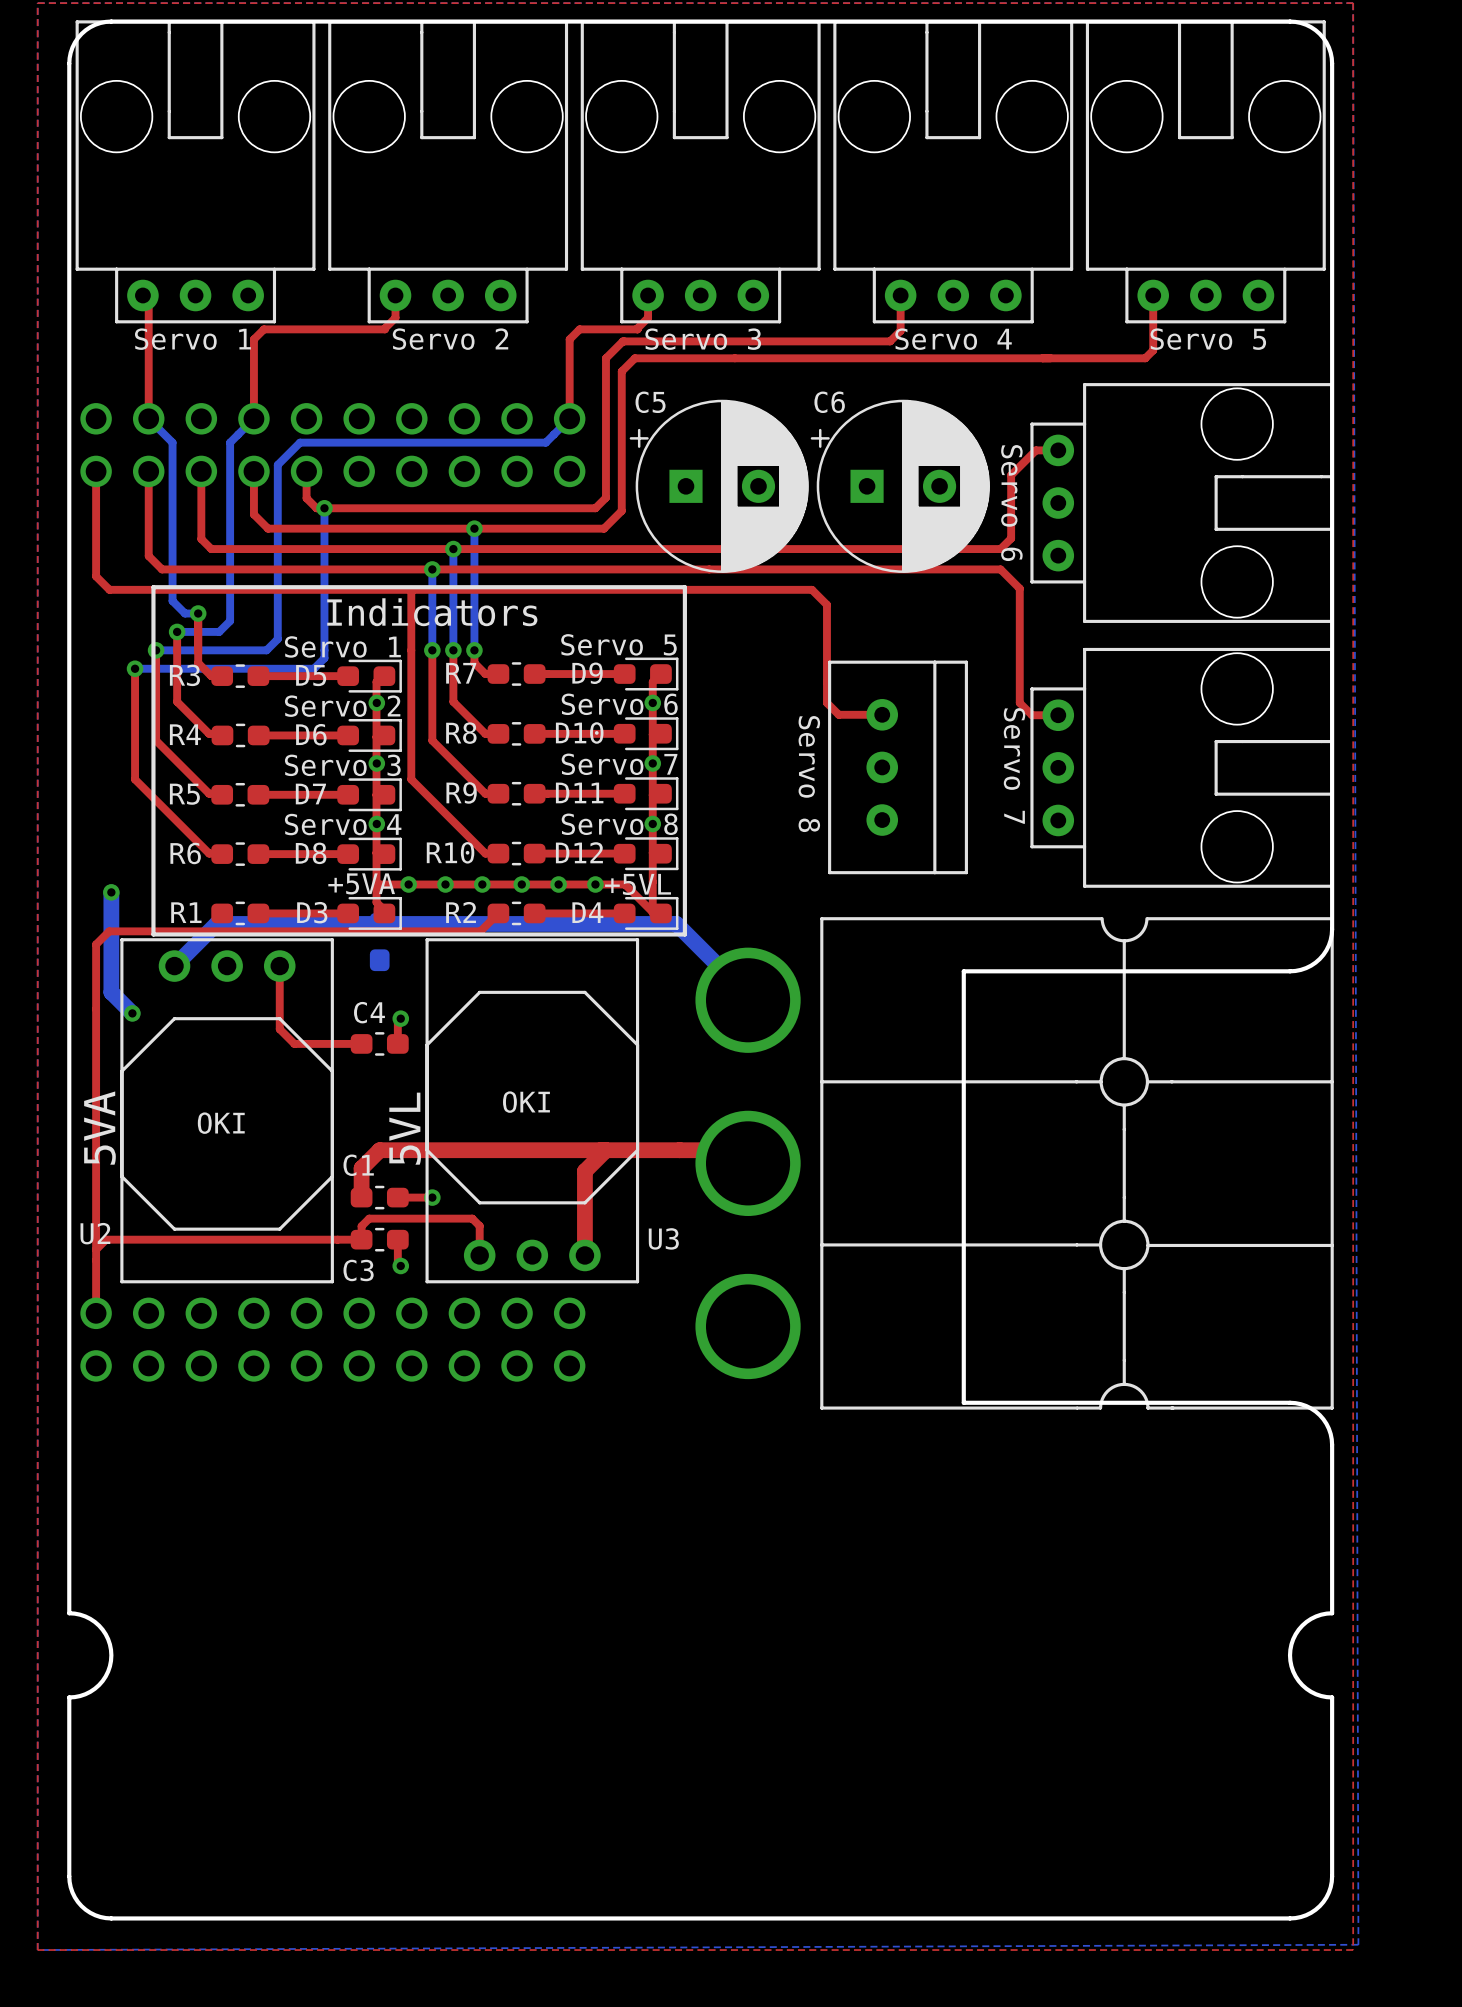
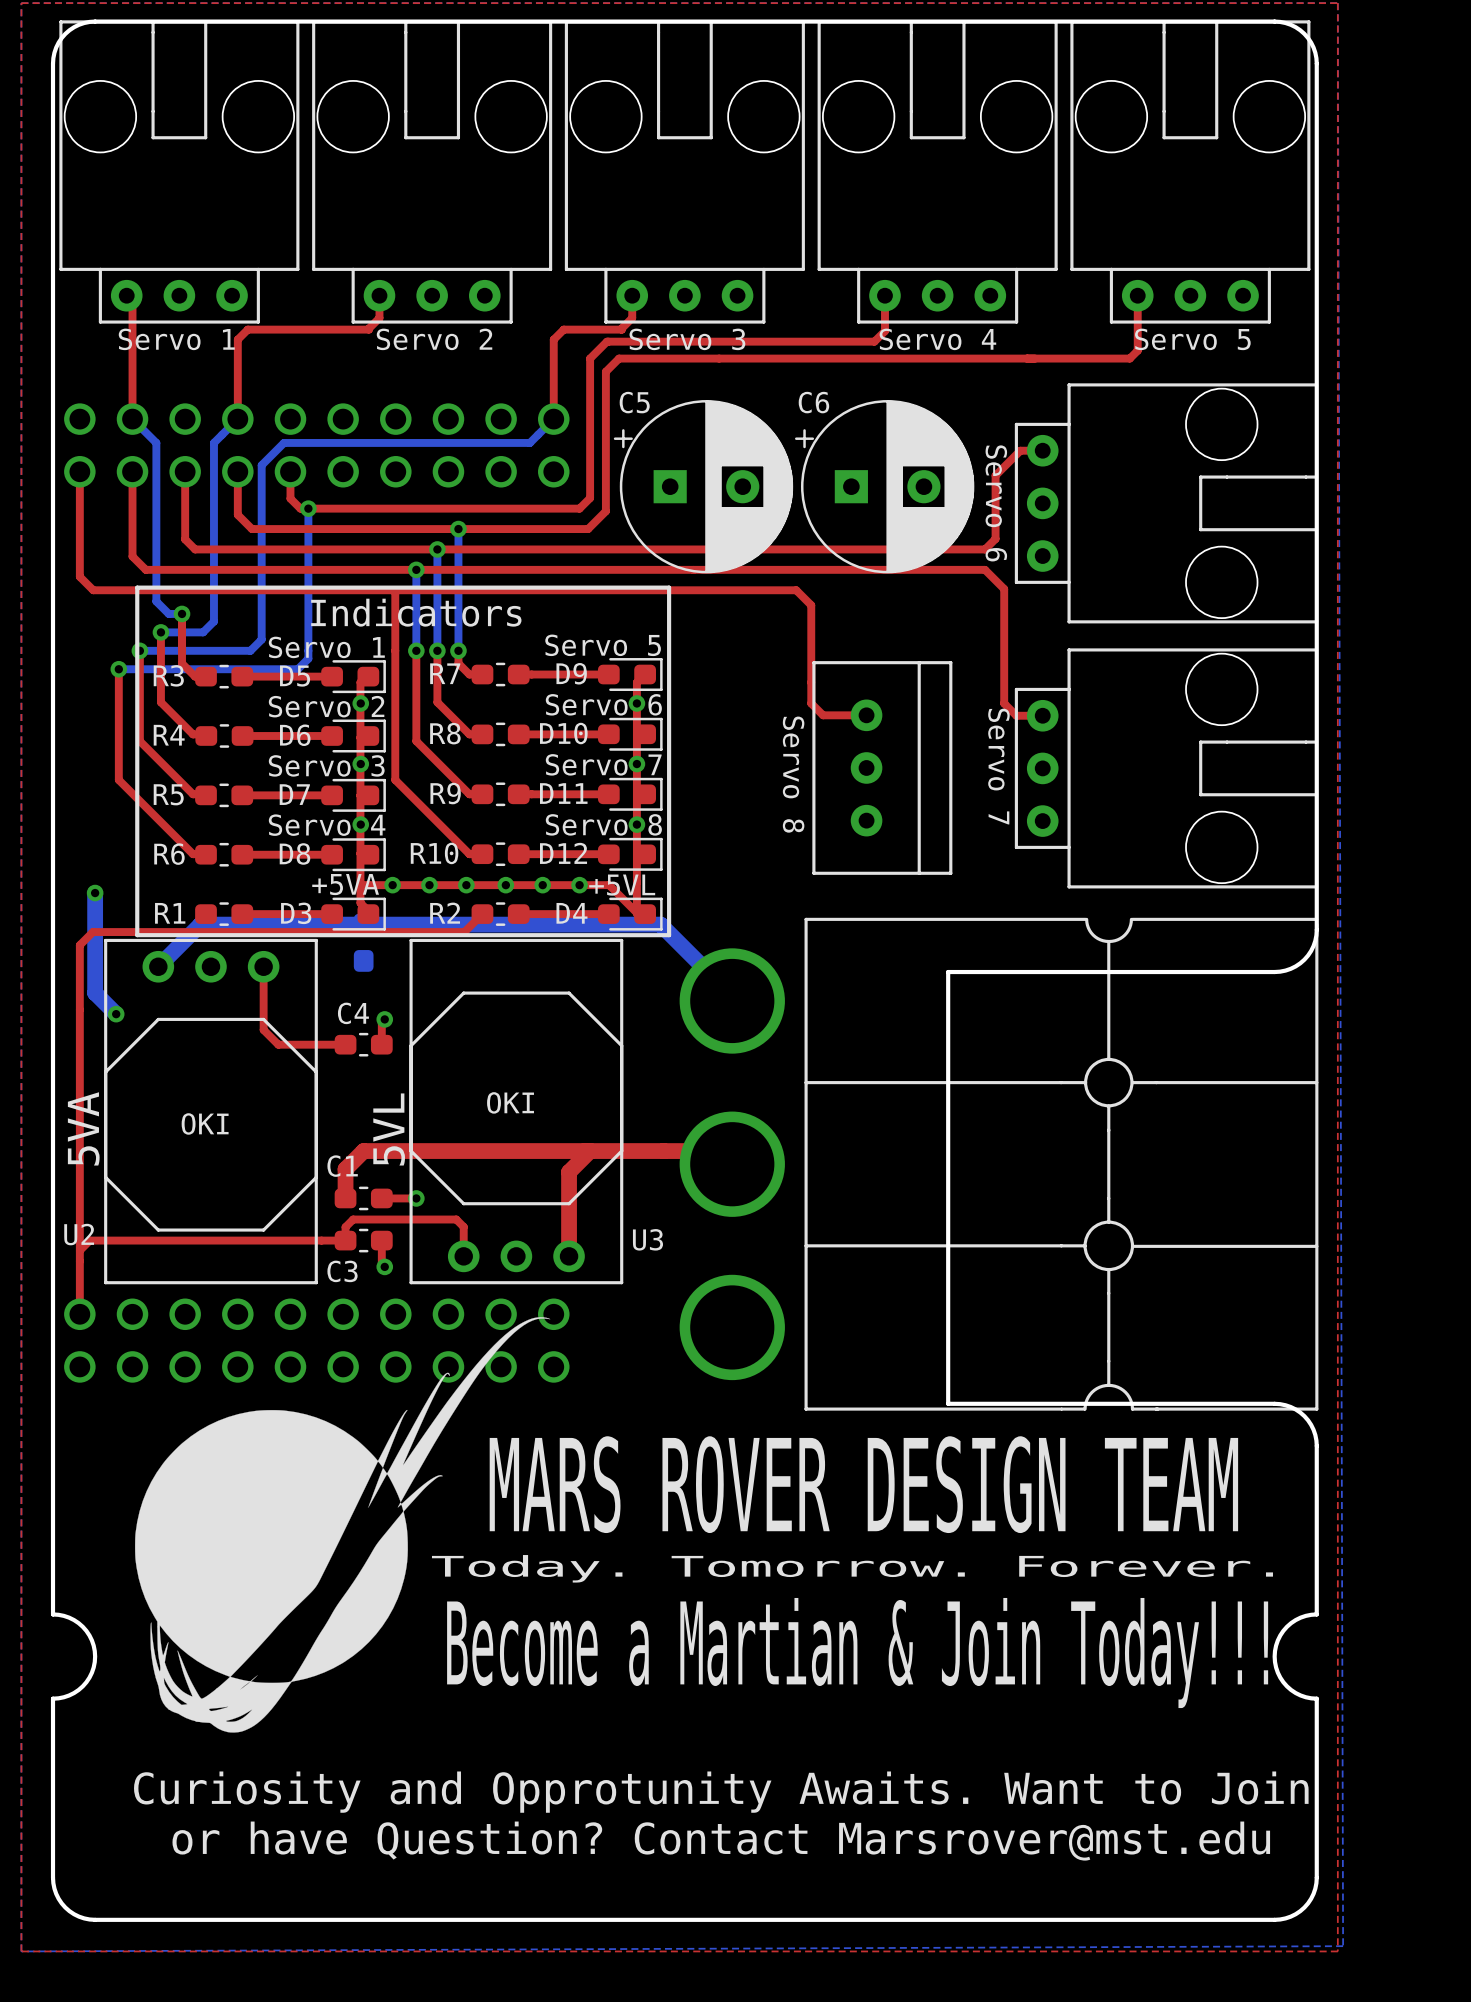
drawing: none -> [135, 1317, 551, 1733]
text: none -> MARS ROVER DESIGN TEAM (863, 1484)
text: none -> Today. Tomorrow. Forever. (852, 1568)
text: none -> Become a Martian & Join Today!!! (857, 1653)
text: none -> Curiosity and Opprotunity Awaits. Want to Join (721, 1792)
text: none -> or have Question? Contact Marsrover@mst.edu (721, 1841)

